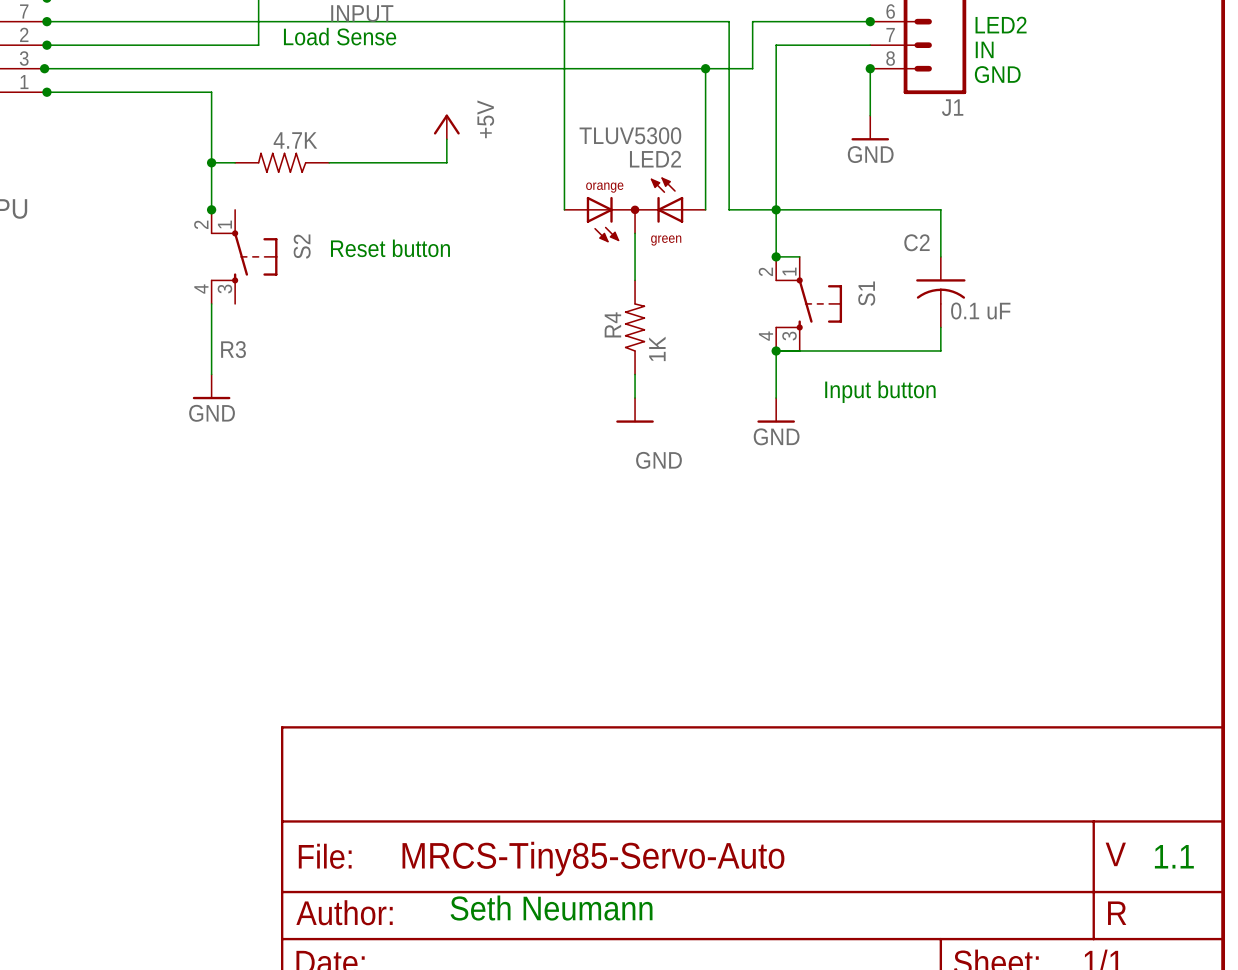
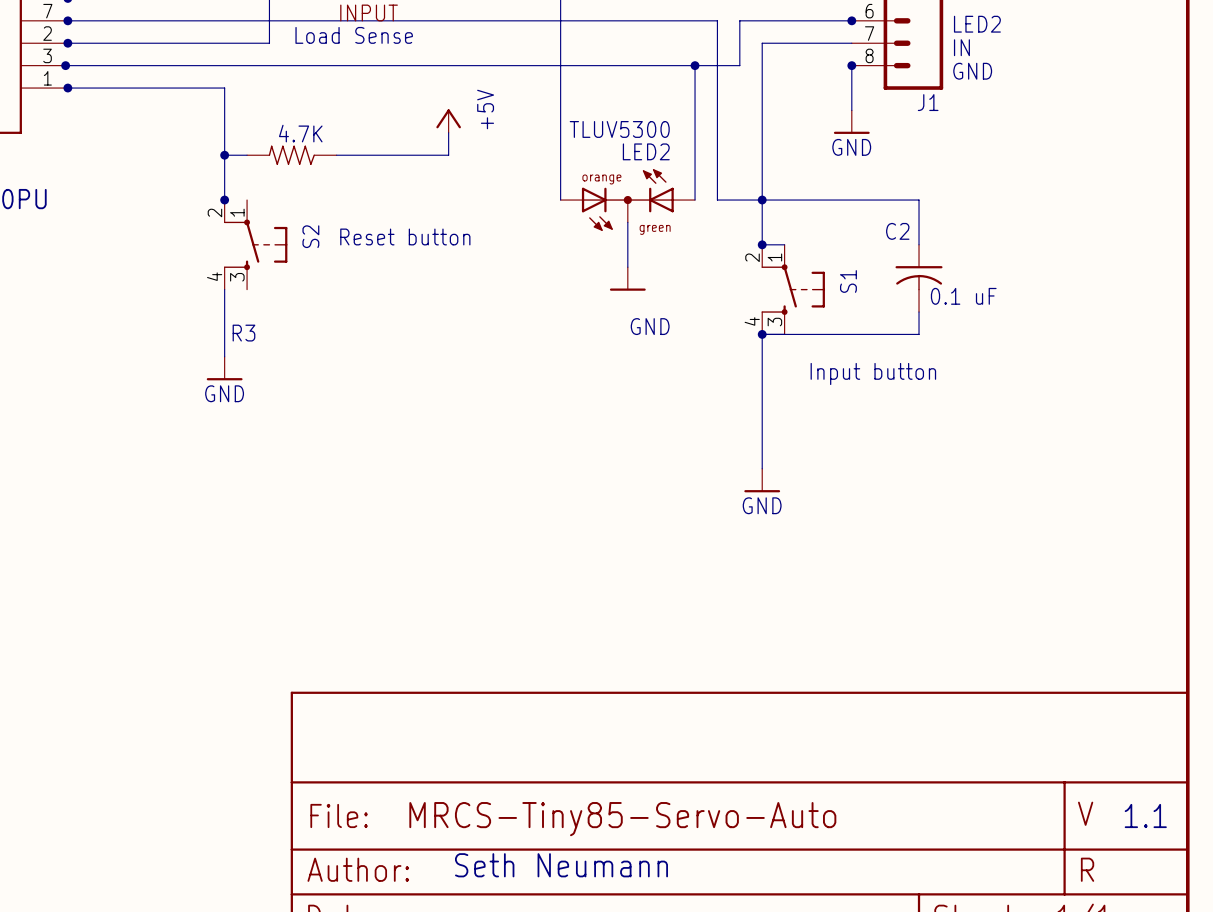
power symbol: none -> GND (627, 278)
R4: 1K (635, 327) -> none
wire: (635, 374) (635, 398) -> none
wire: none -> (762, 379) (762, 468)
power symbol: GND (635, 410) -> none
power symbol: GND (776, 410) -> none
power symbol: none -> GND (762, 480)

